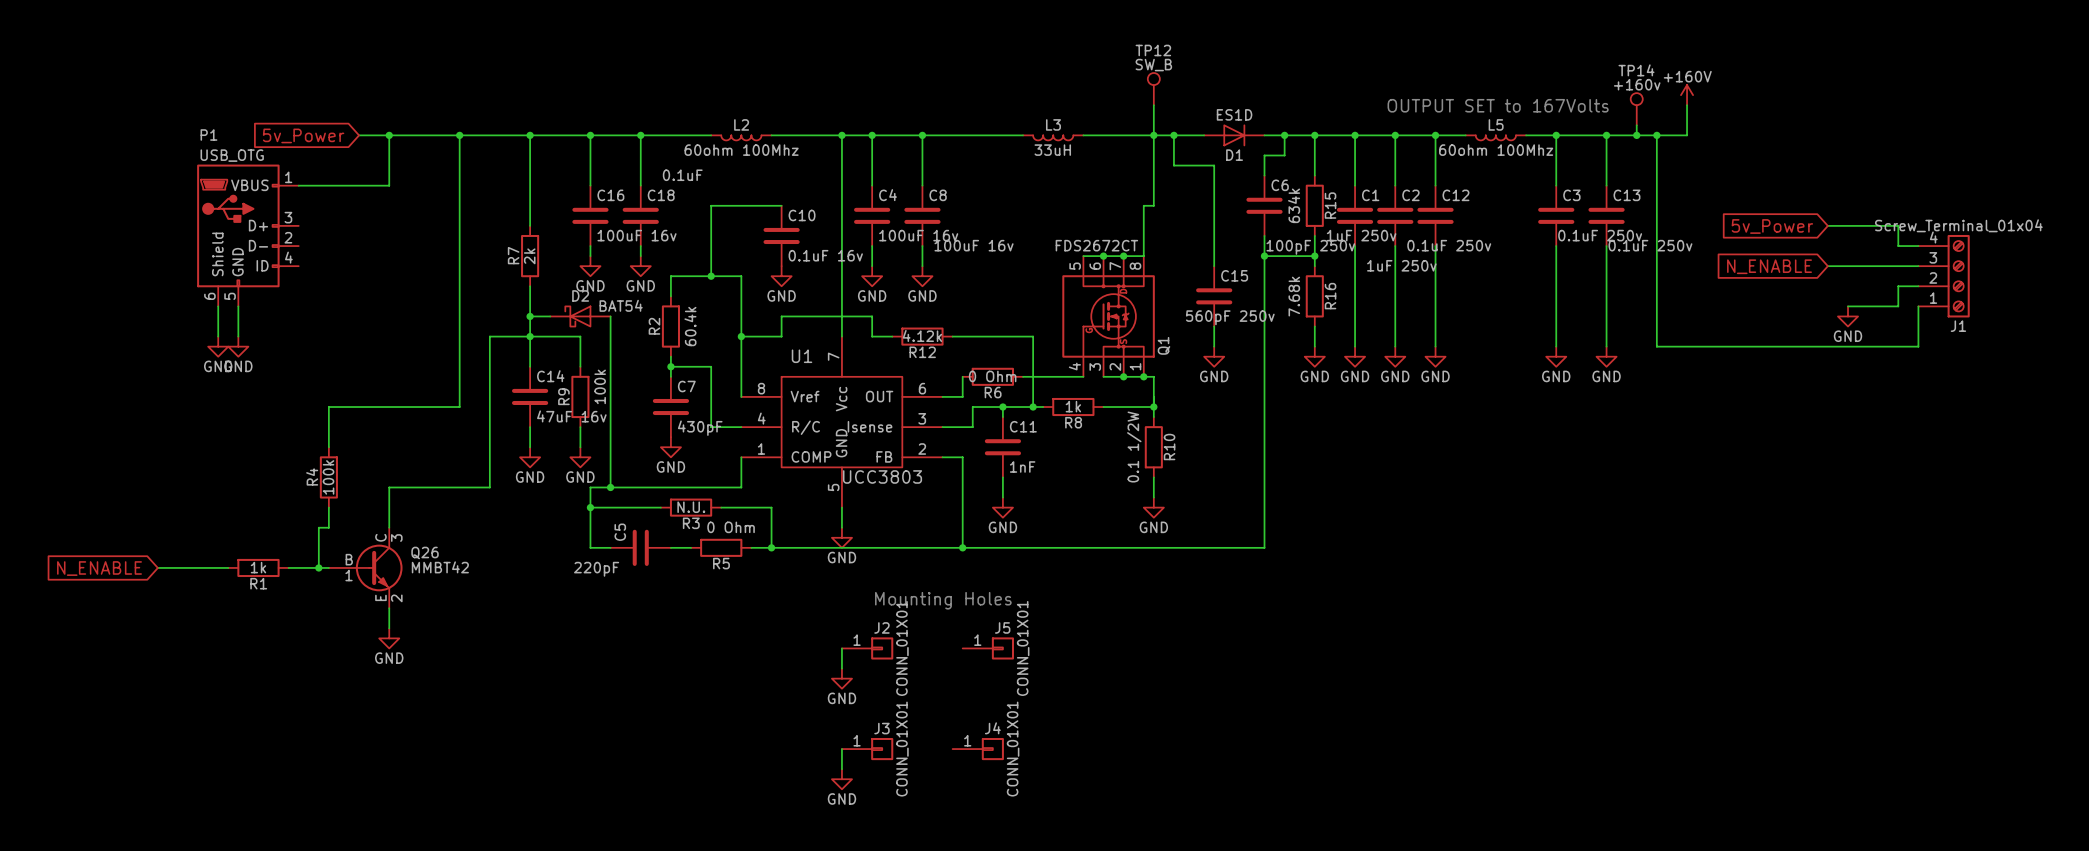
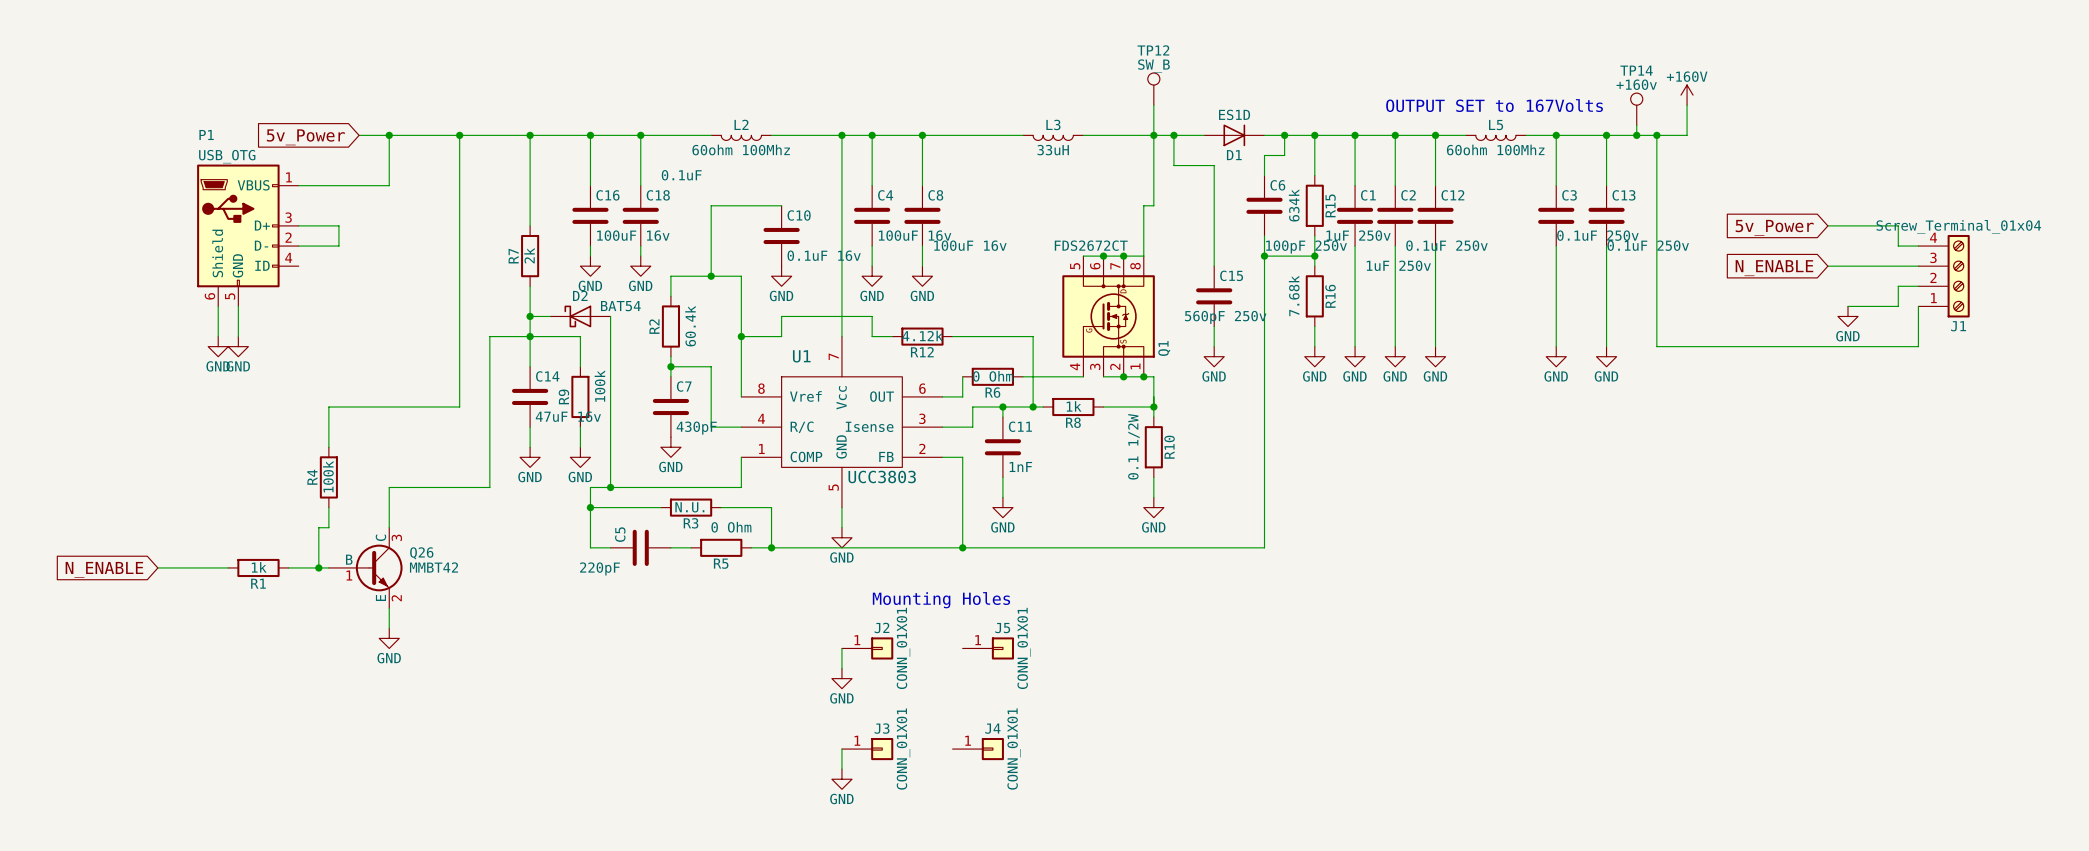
wire: none -> (298, 225) (338, 225) (338, 246) (298, 246)

